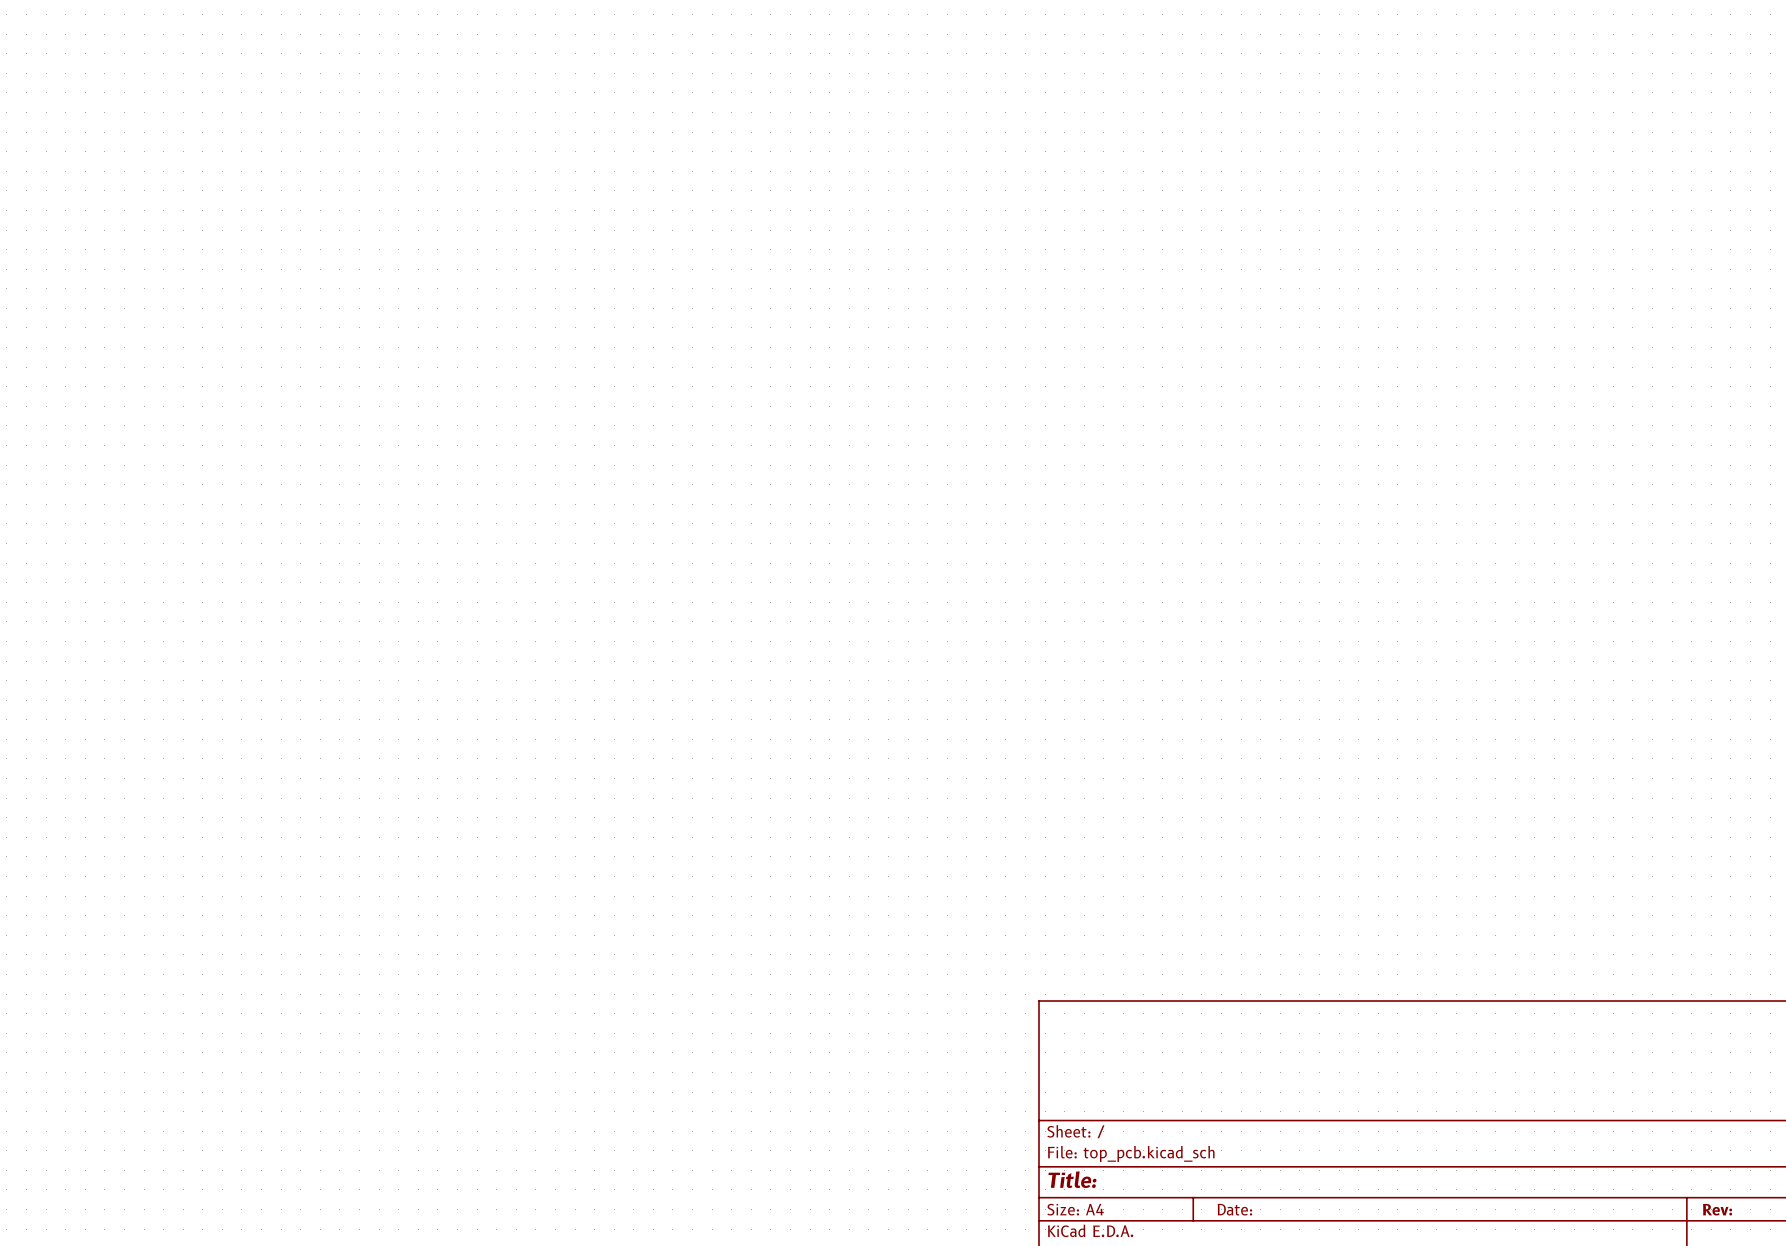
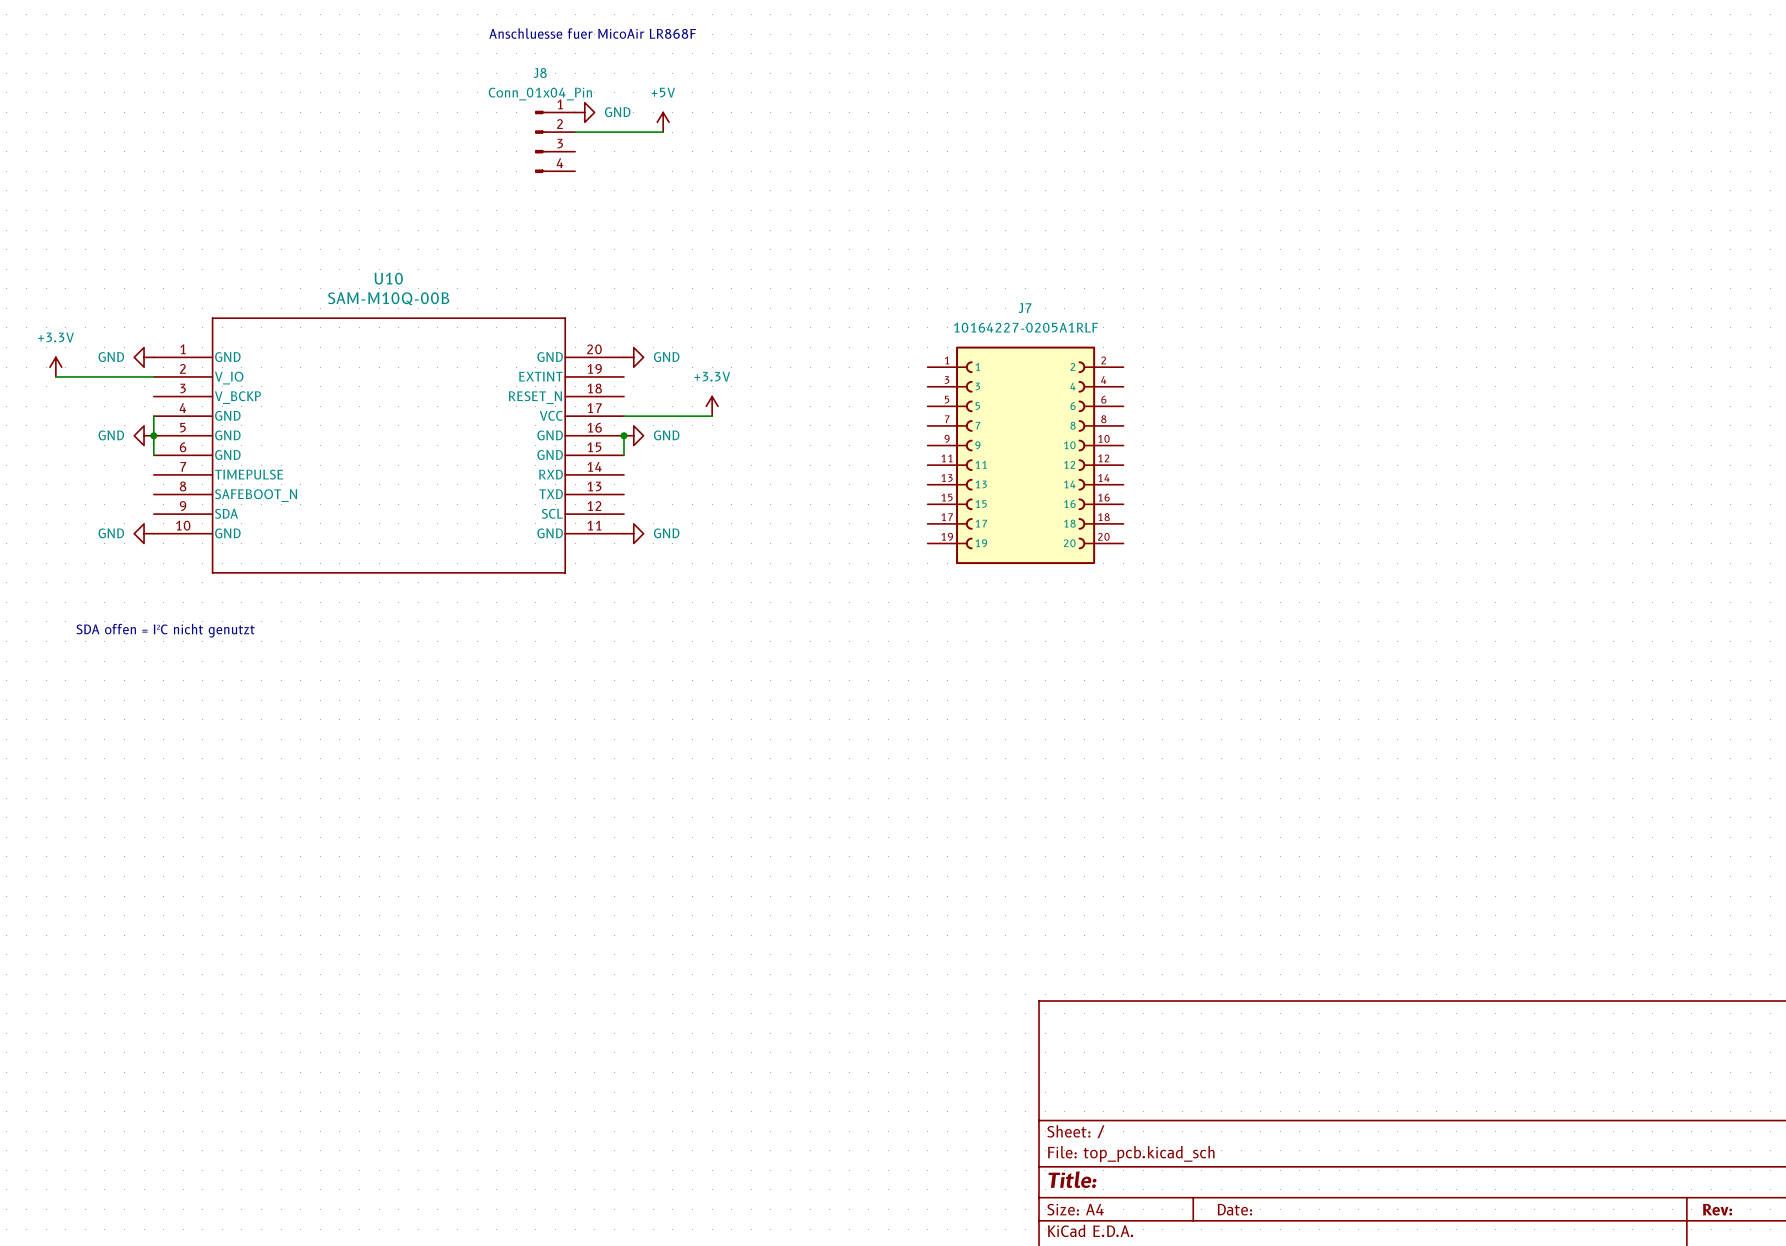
text: none -> Anschluesse fuer MicoAir LR868F (592, 33)
power symbol: none -> GND (584, 112)
power symbol: none -> +5V (663, 122)
wire: none -> (575, 132) (663, 132)
J8: none -> Conn_01x04_Pin (555, 141)
power symbol: none -> GND (144, 357)
power symbol: none -> GND (633, 357)
power symbol: none -> +3.3V (55, 367)
wire: none -> (55, 376) (153, 376)
power symbol: none -> +3.3V (712, 406)
wire: none -> (153, 416) (153, 455)
wire: none -> (623, 416) (712, 416)
power symbol: none -> GND (144, 435)
junction: none -> (153, 435)
wire: none -> (623, 435) (623, 455)
junction: none -> (623, 435)
power symbol: none -> GND (633, 435)
U10: none -> SAM-M10Q-00B (388, 445)
J7: none -> 10164227-0205A1RLF (1025, 455)
power symbol: none -> GND (144, 533)
power symbol: none -> GND (633, 533)
text: none -> SDA offen = I²C nicht genutzt (165, 630)

